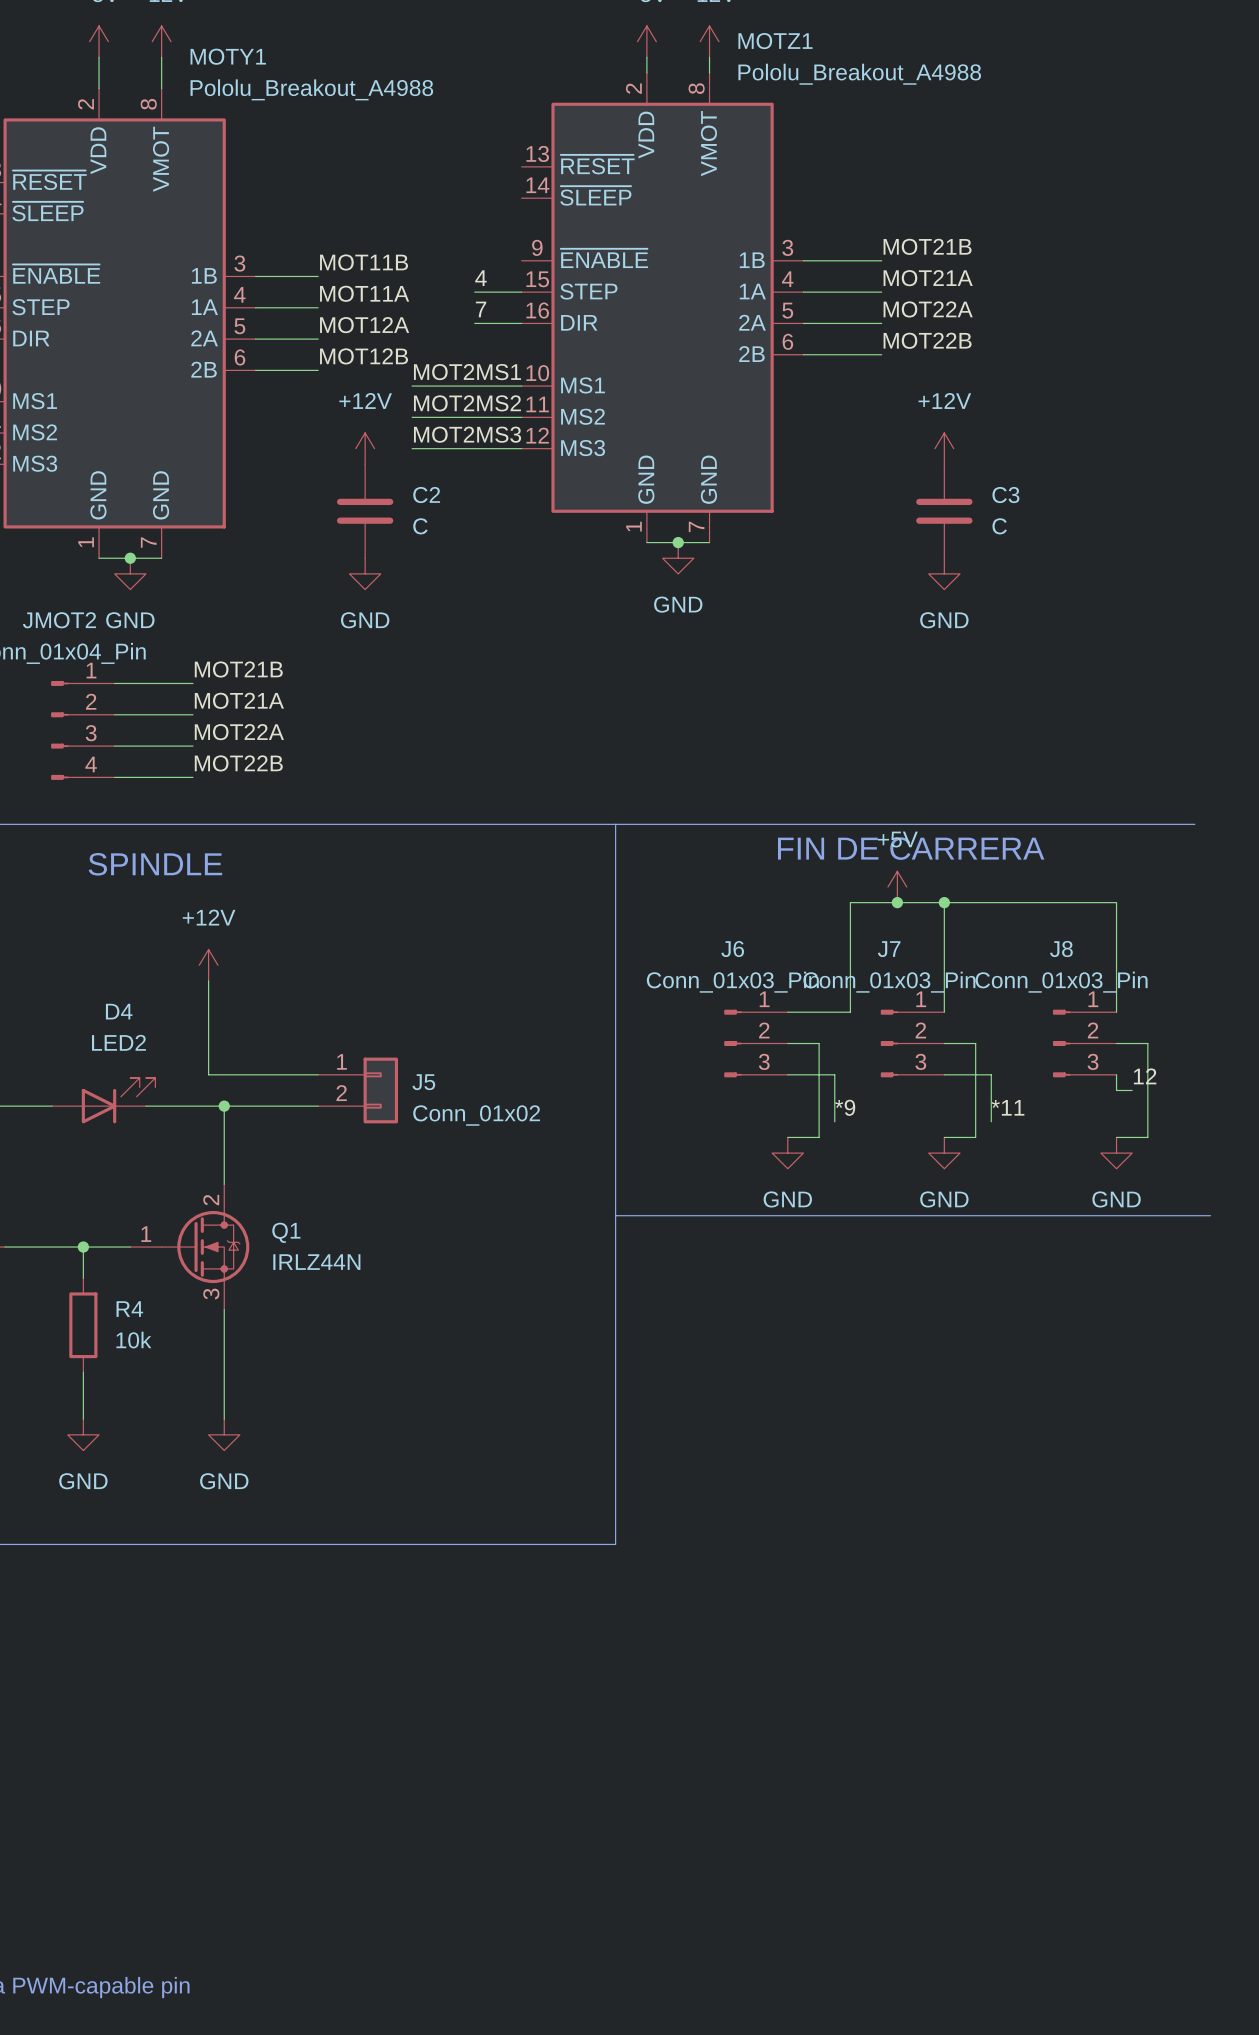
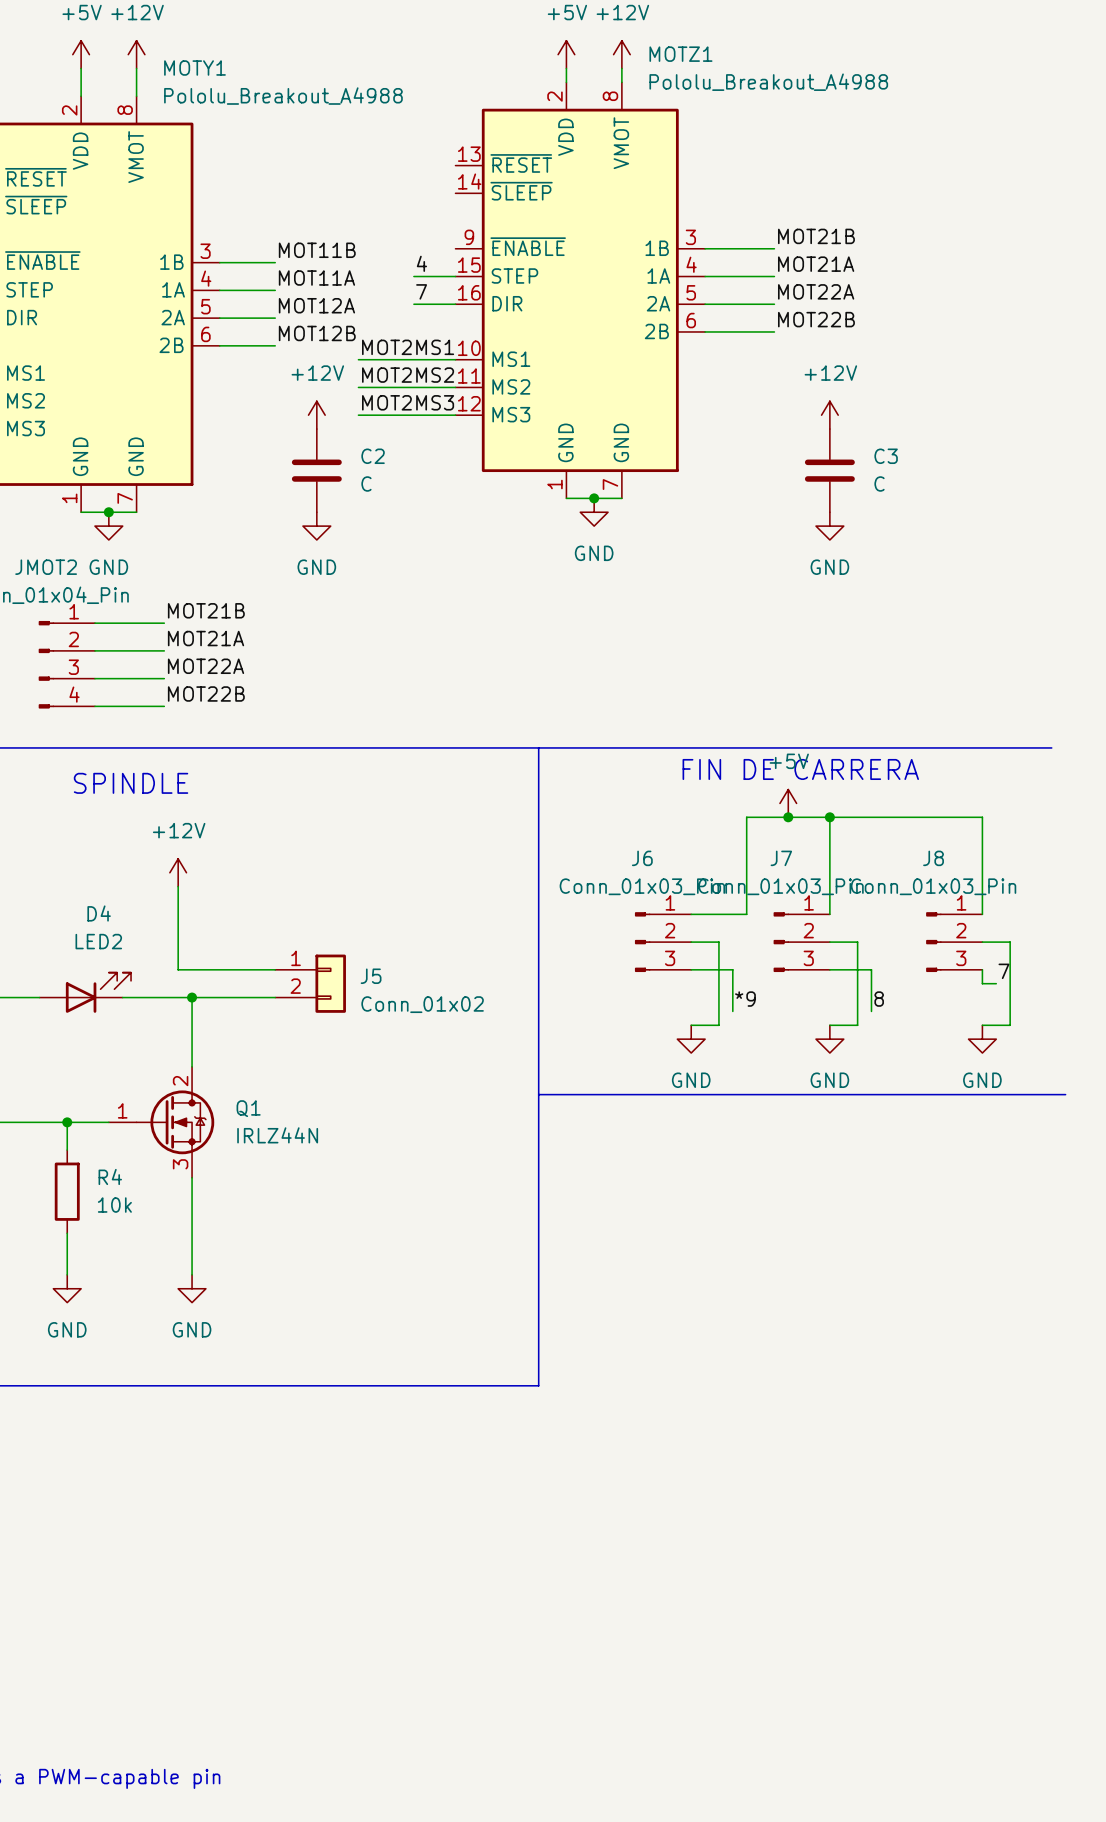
label: 12 (1145, 1076) -> 7 (1003, 971)
label: *11 (1008, 1107) -> 8 (879, 999)

